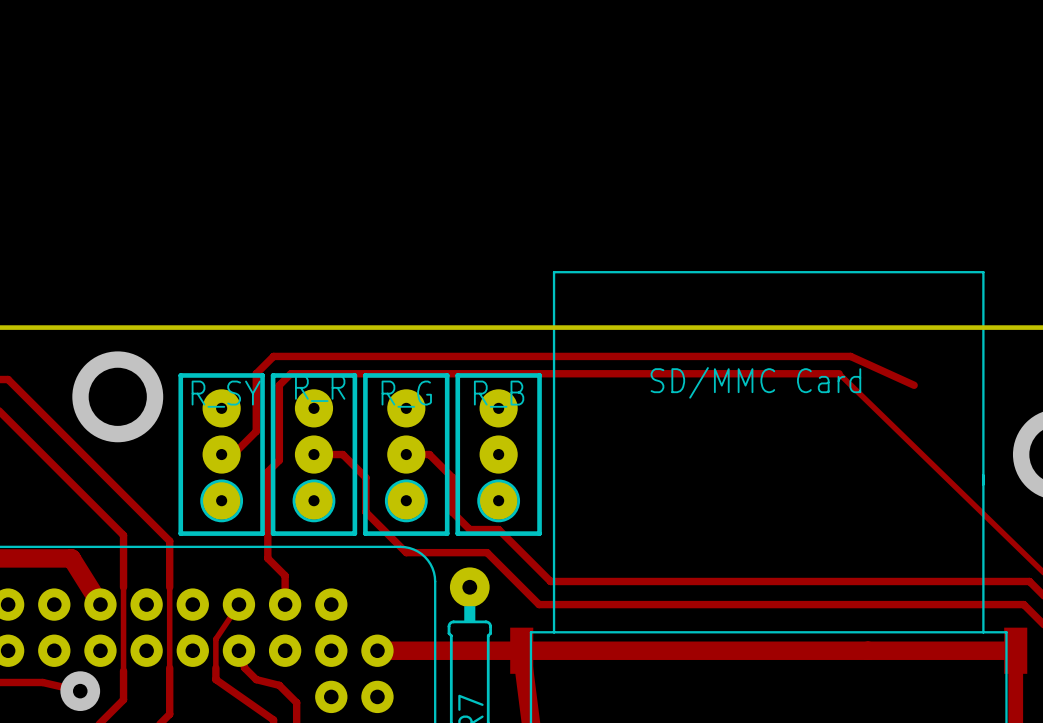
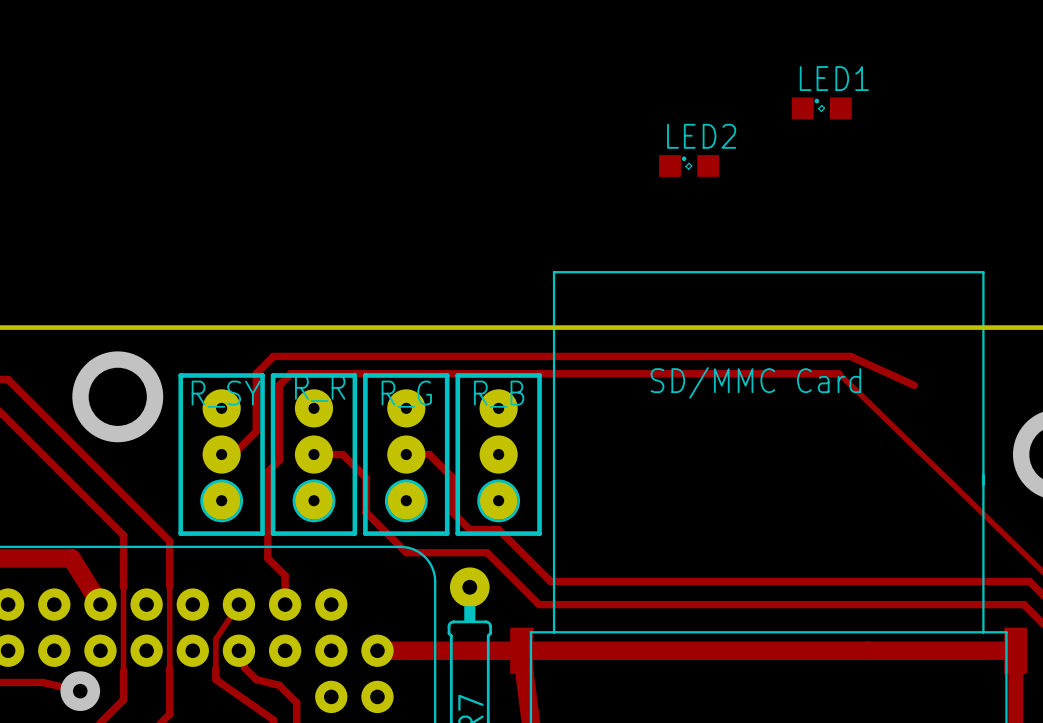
LED1: none -> (821, 108)
LED2: none -> (689, 165)

